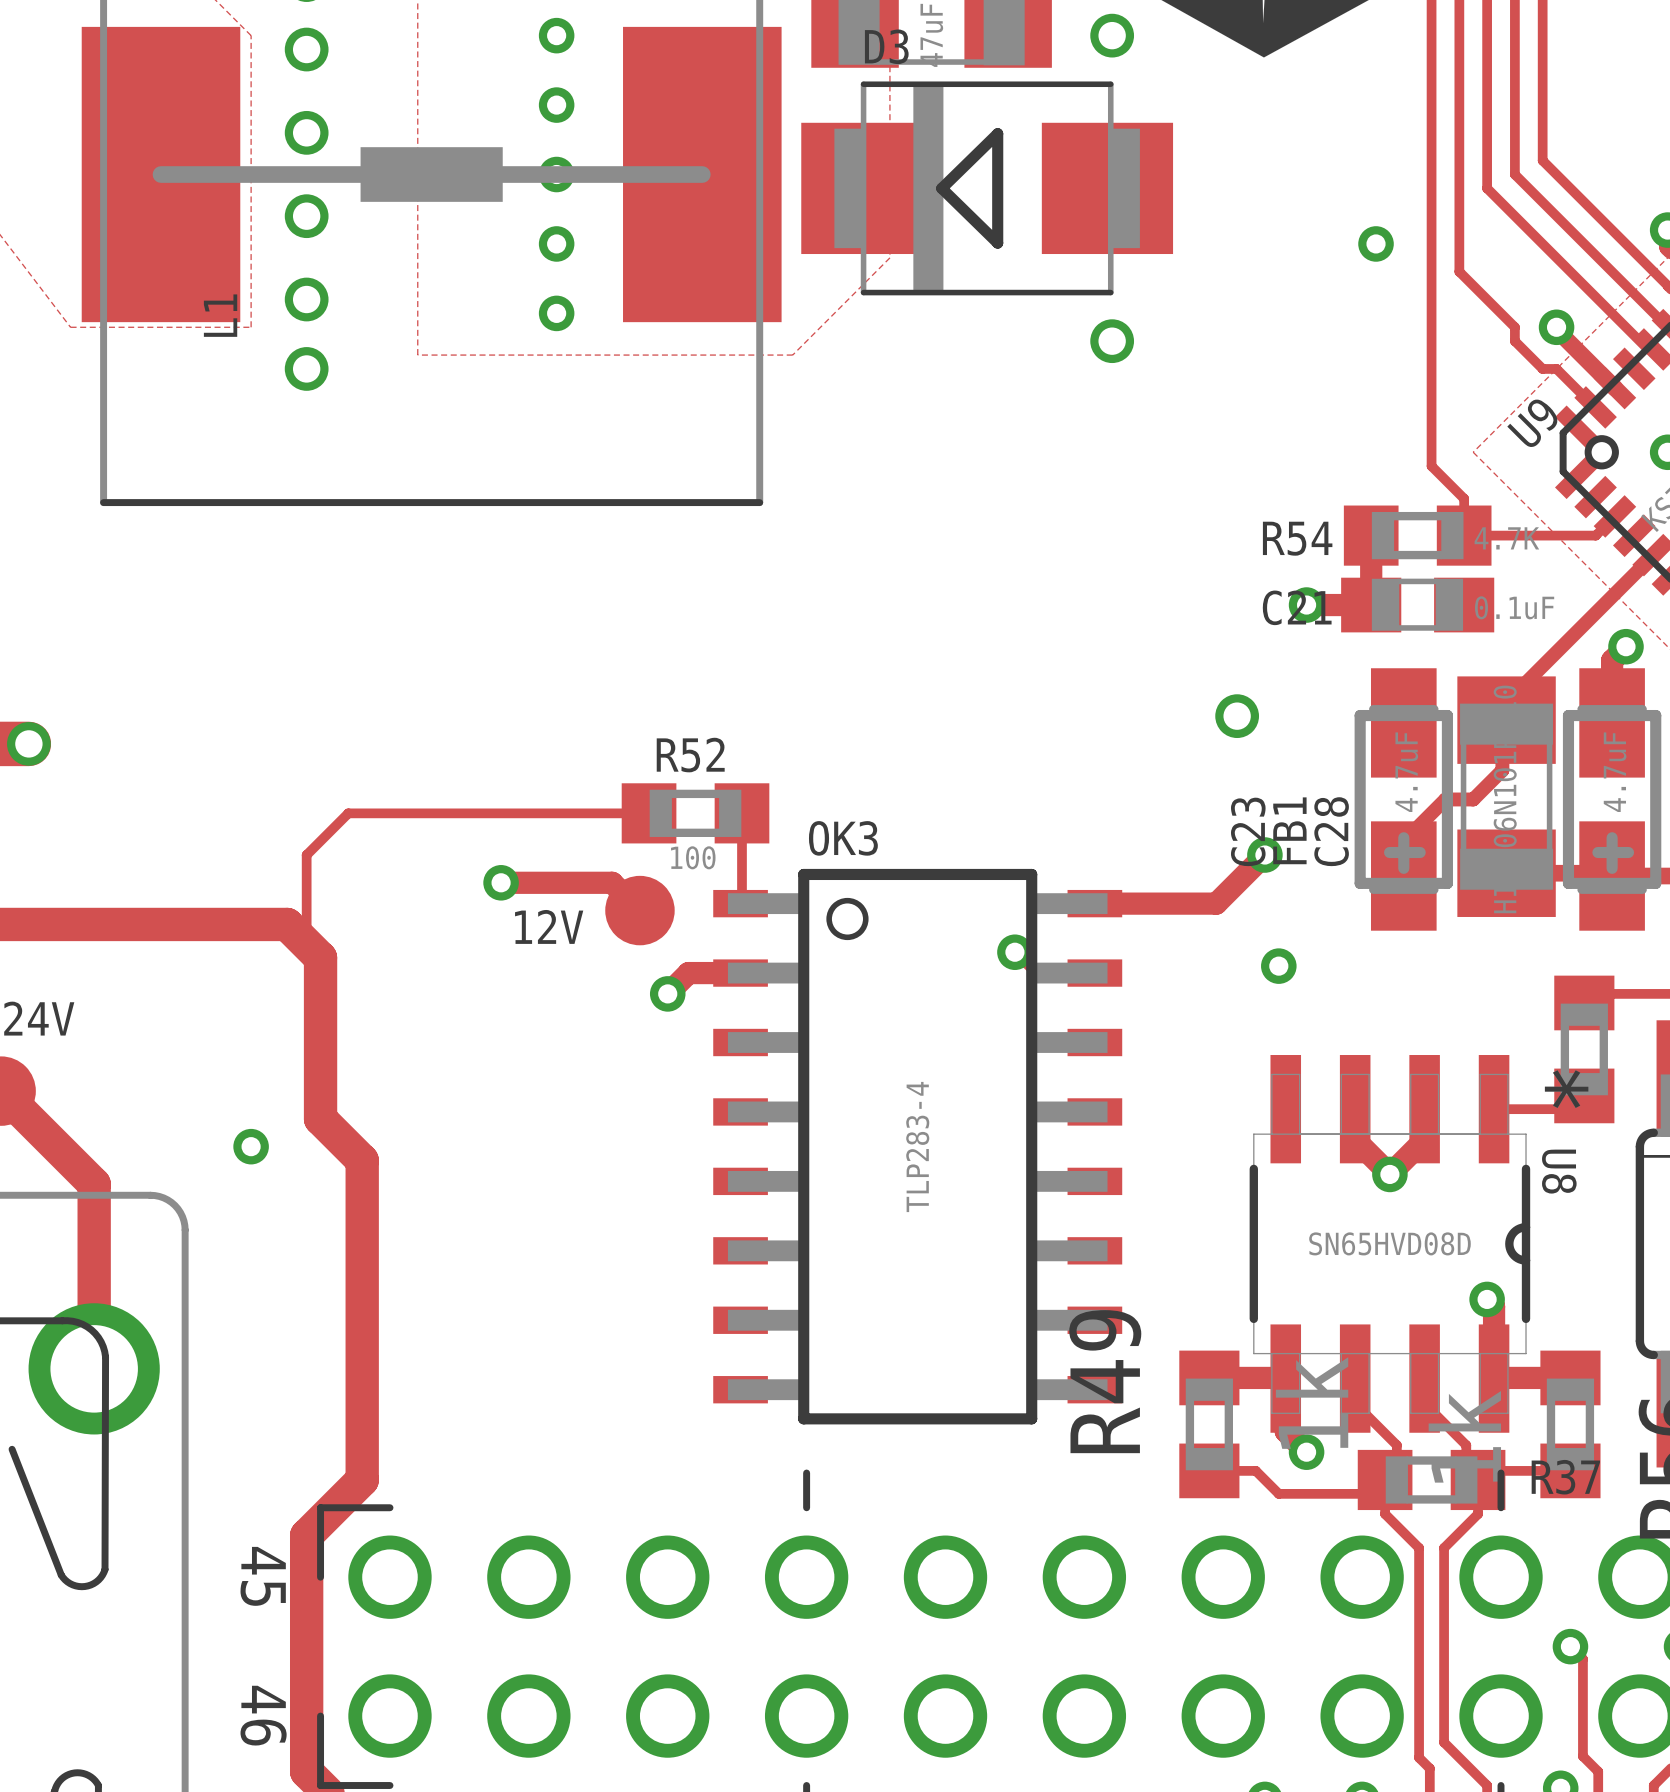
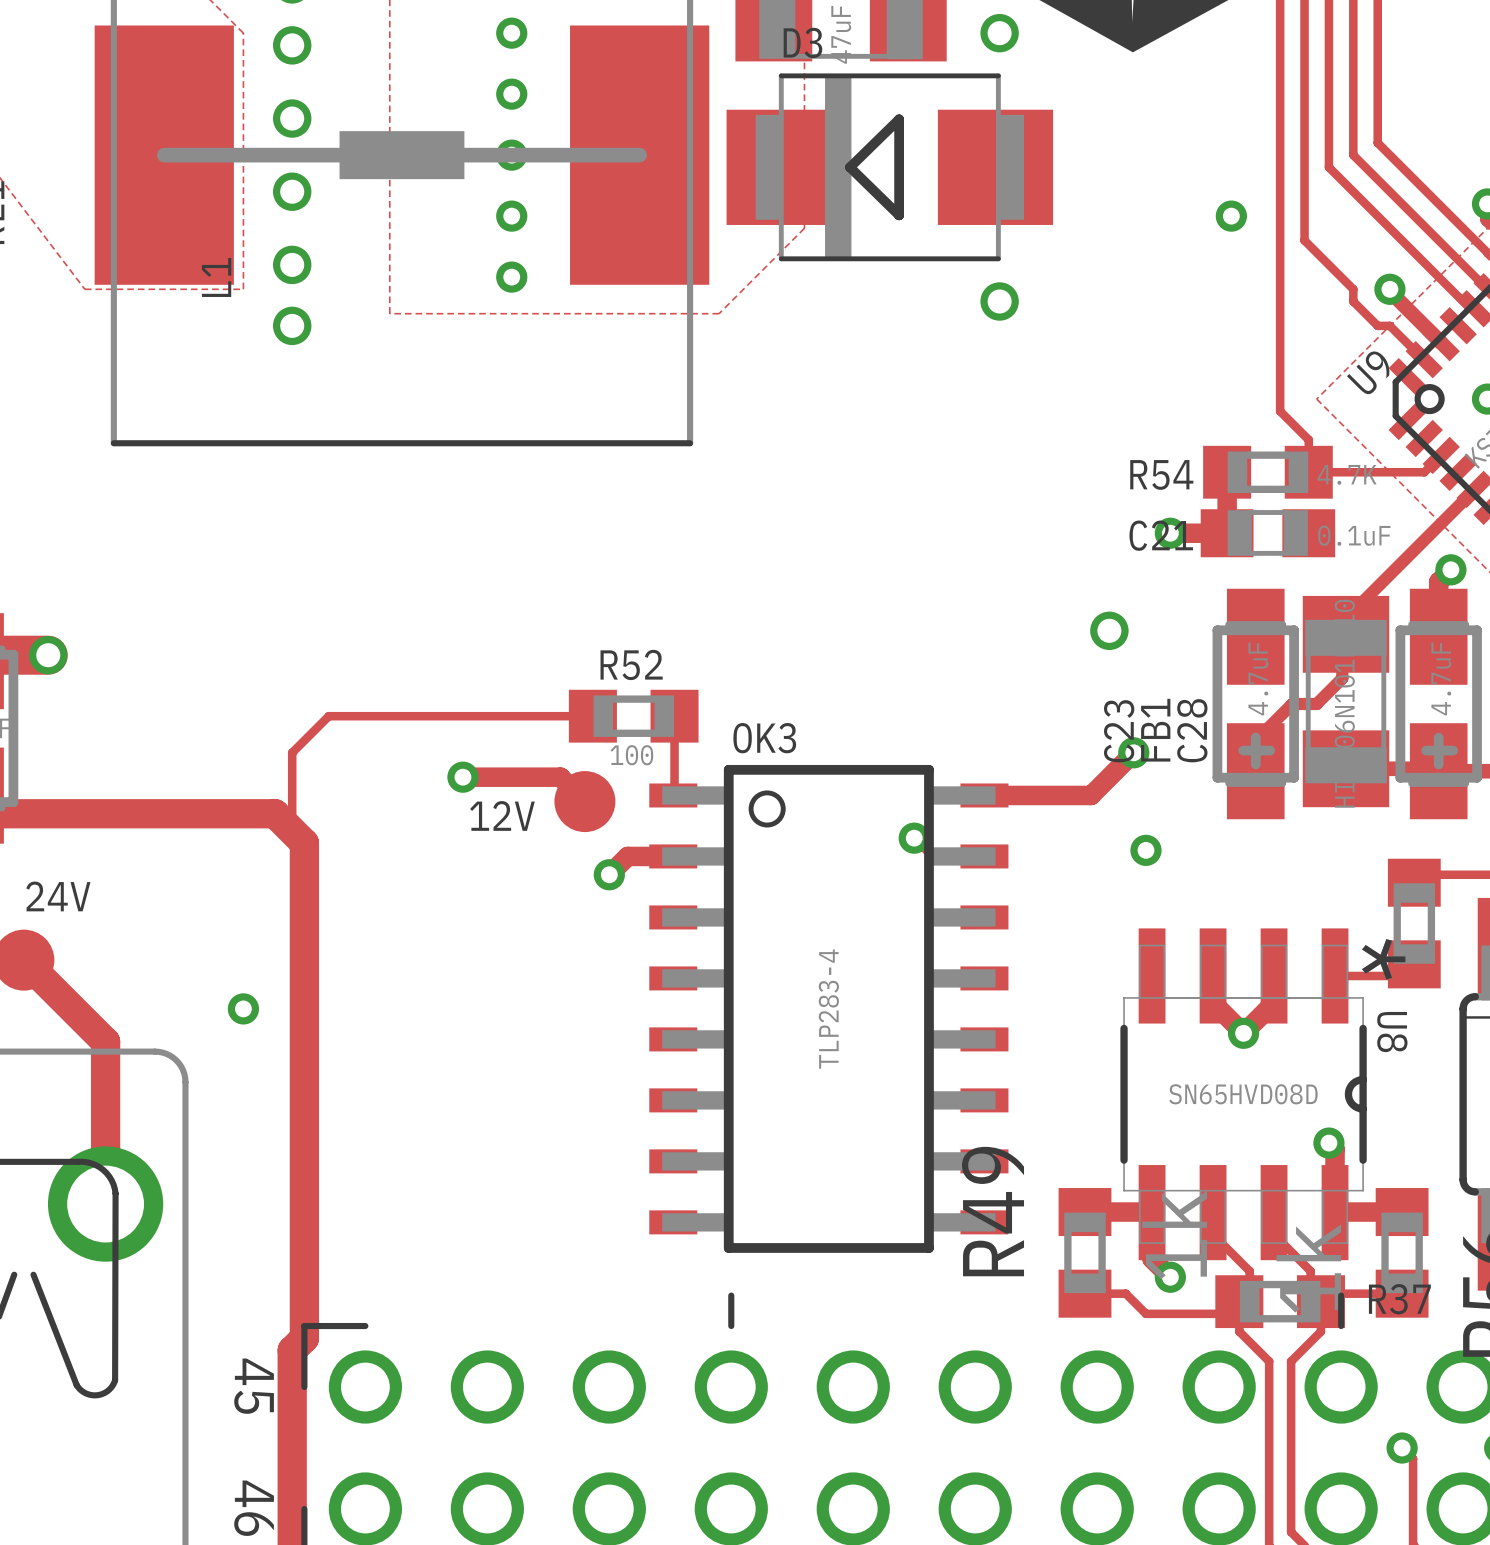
track: (320, 1118) (362, 1160) (362, 1479) (320, 1521) -> (304, 984) (304, 1338)

